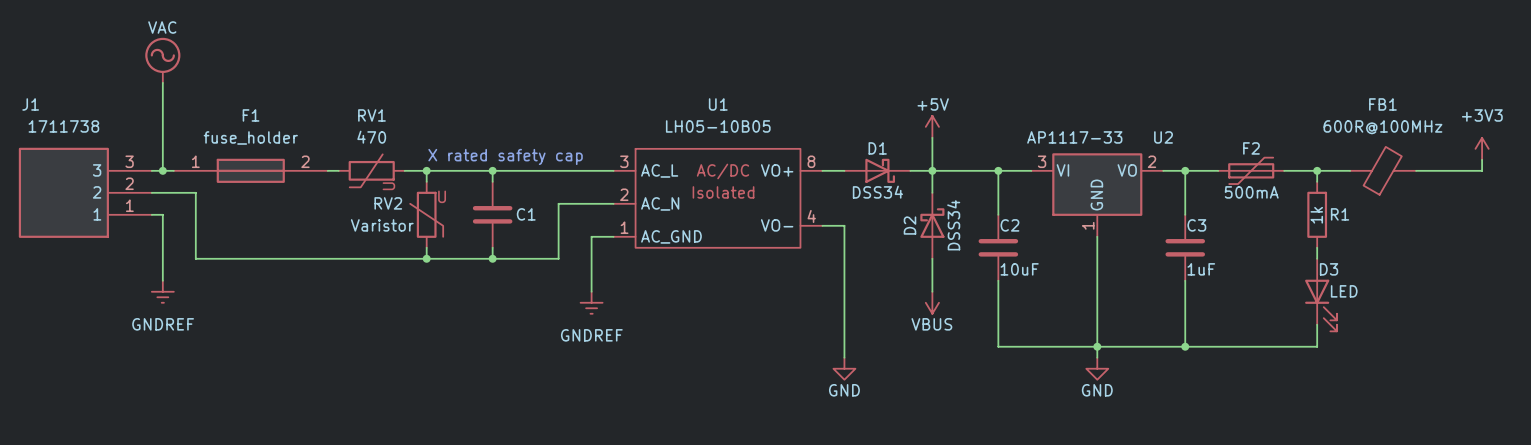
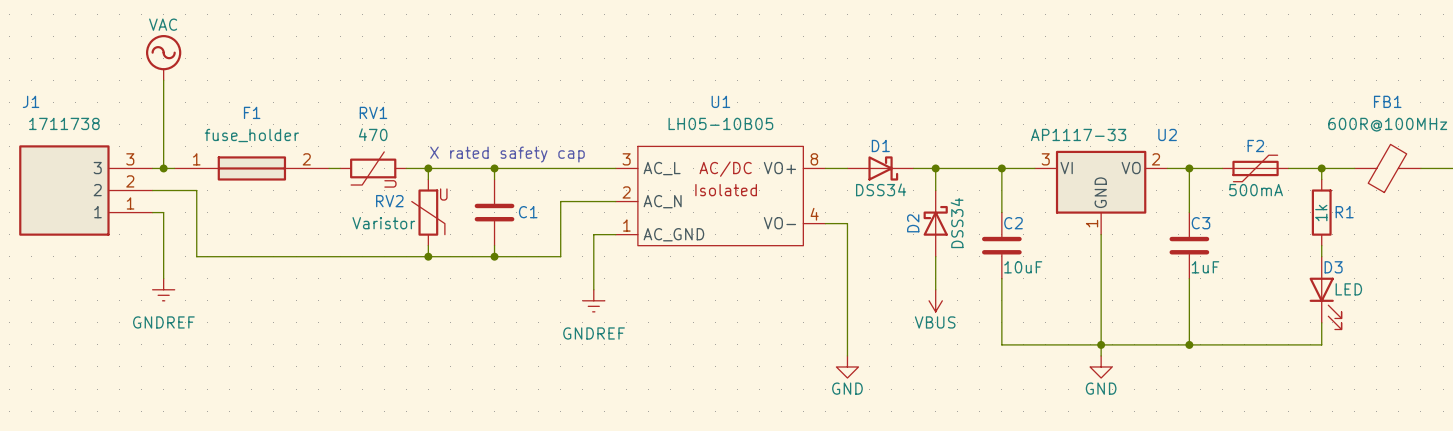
power symbol: +5V (932, 126) -> none
wire: (932, 137) (932, 170) -> none

